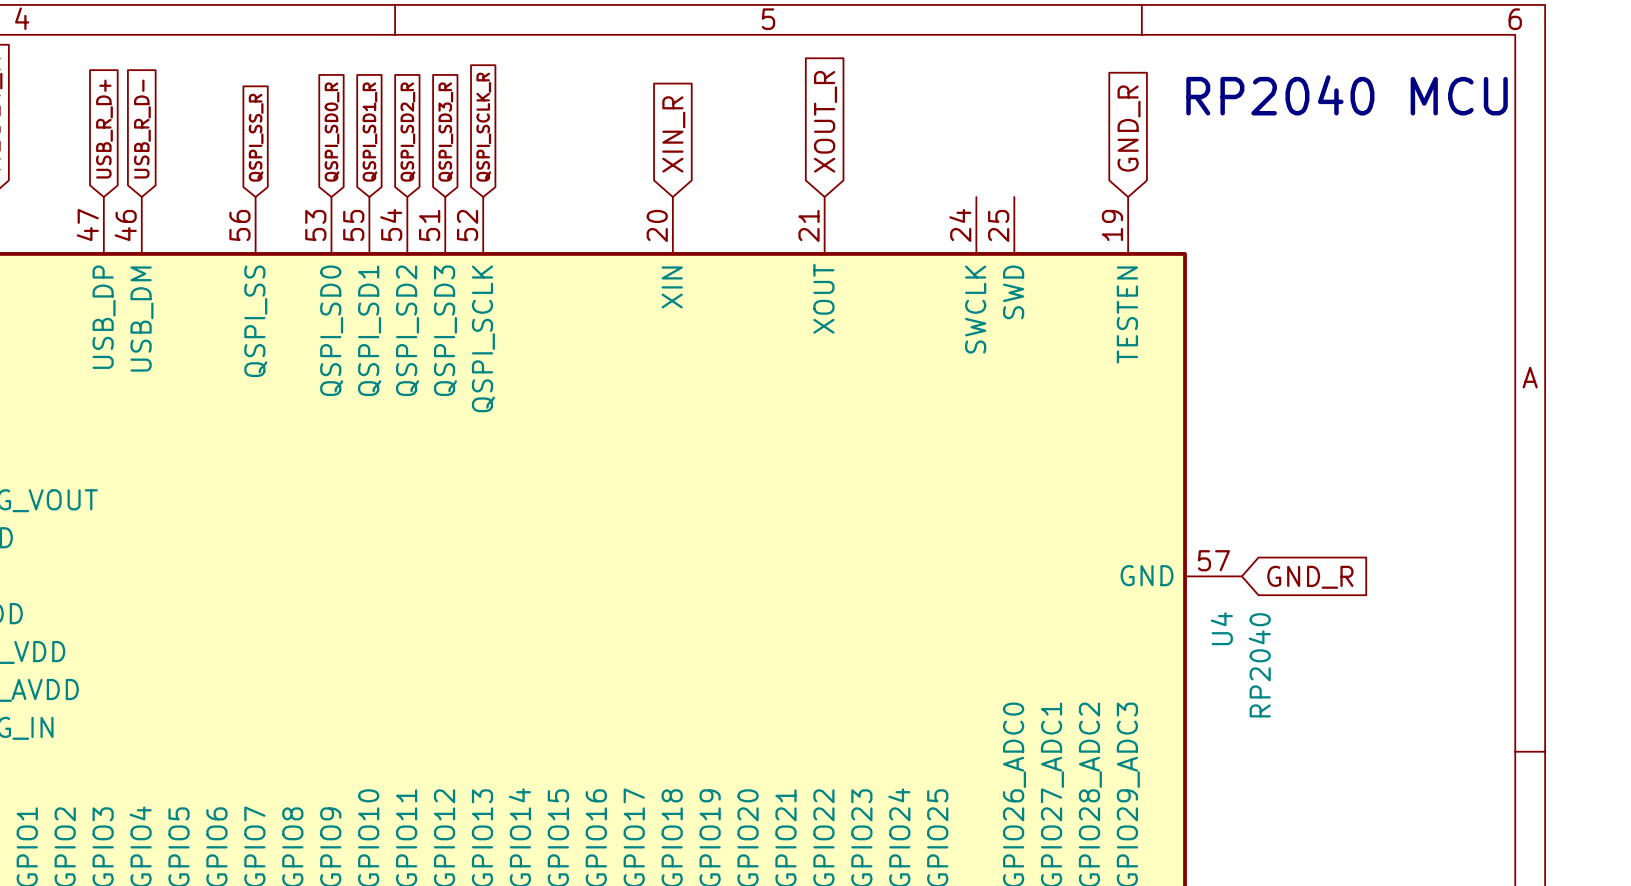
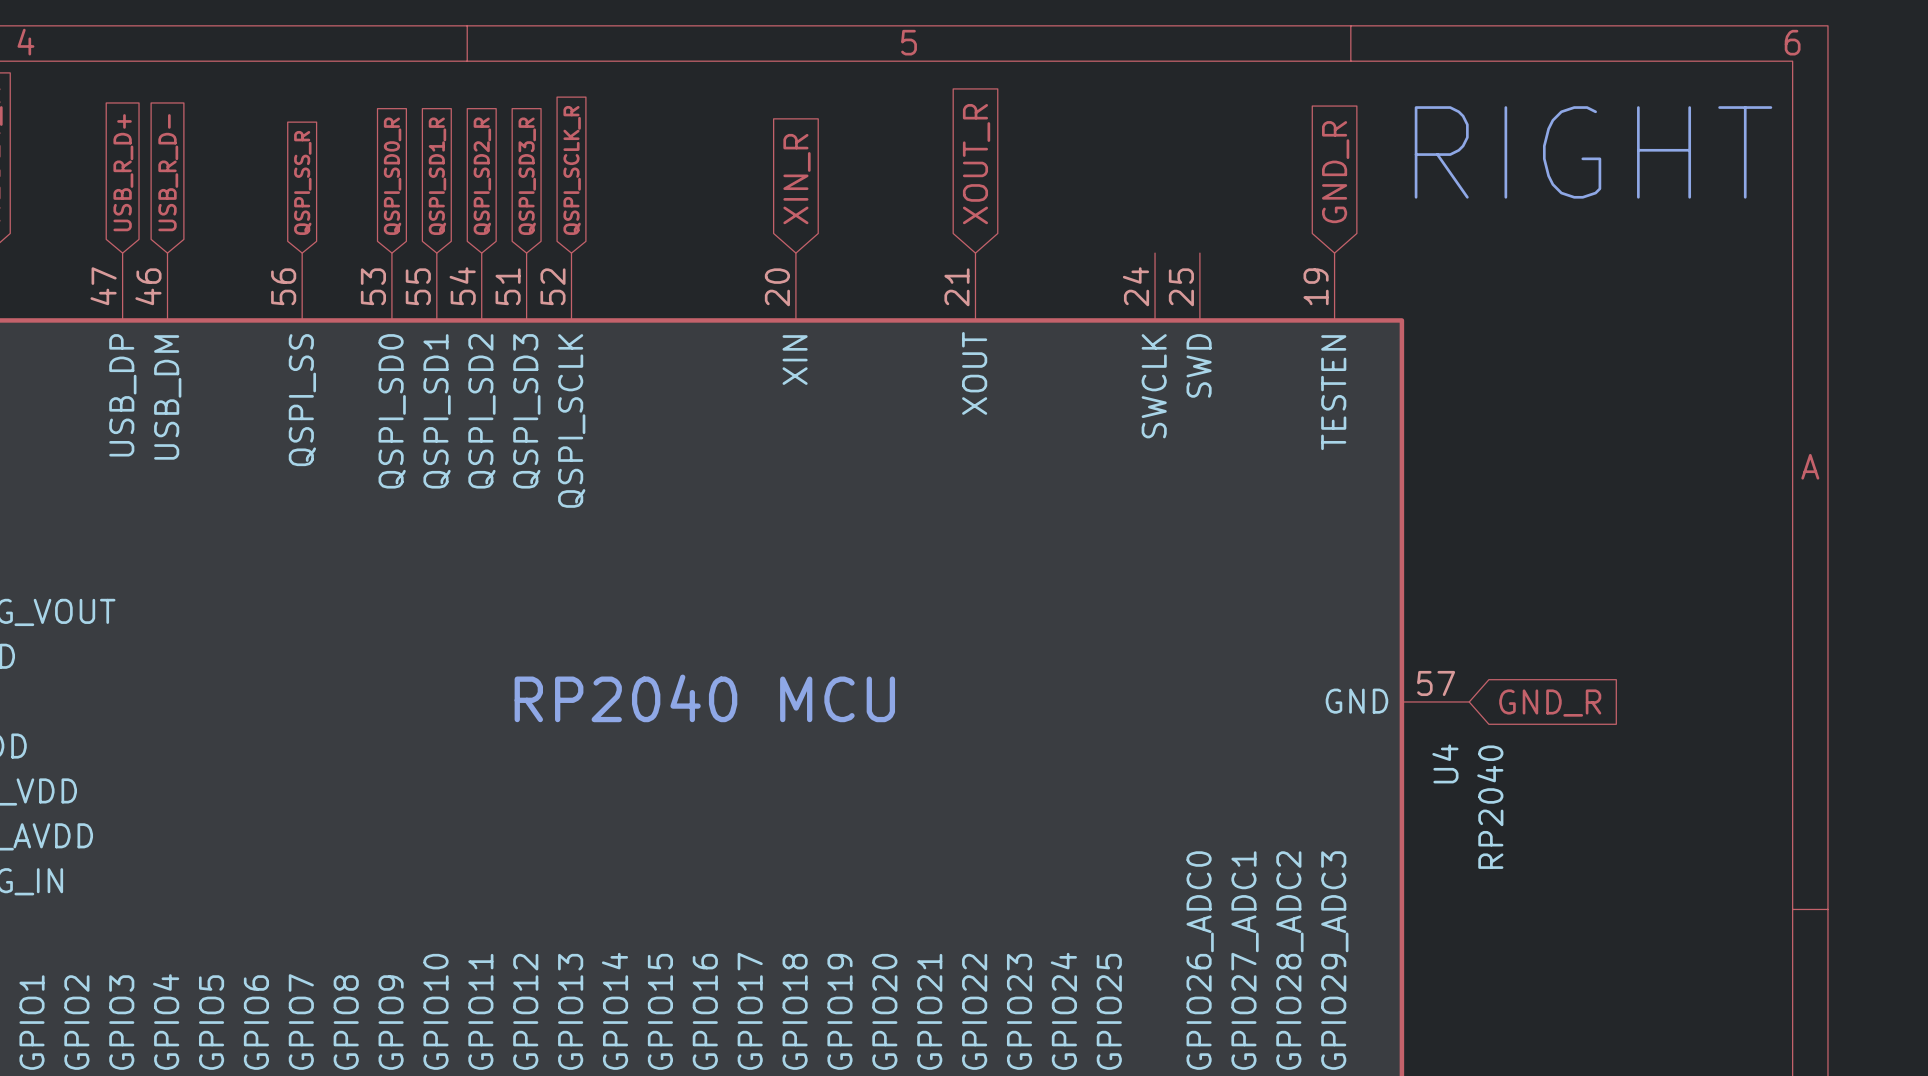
text: RP2040 MCU (1347, 95) -> none
text: none -> RIGHT (1593, 152)
text: none -> RP2040 MCU (704, 698)

